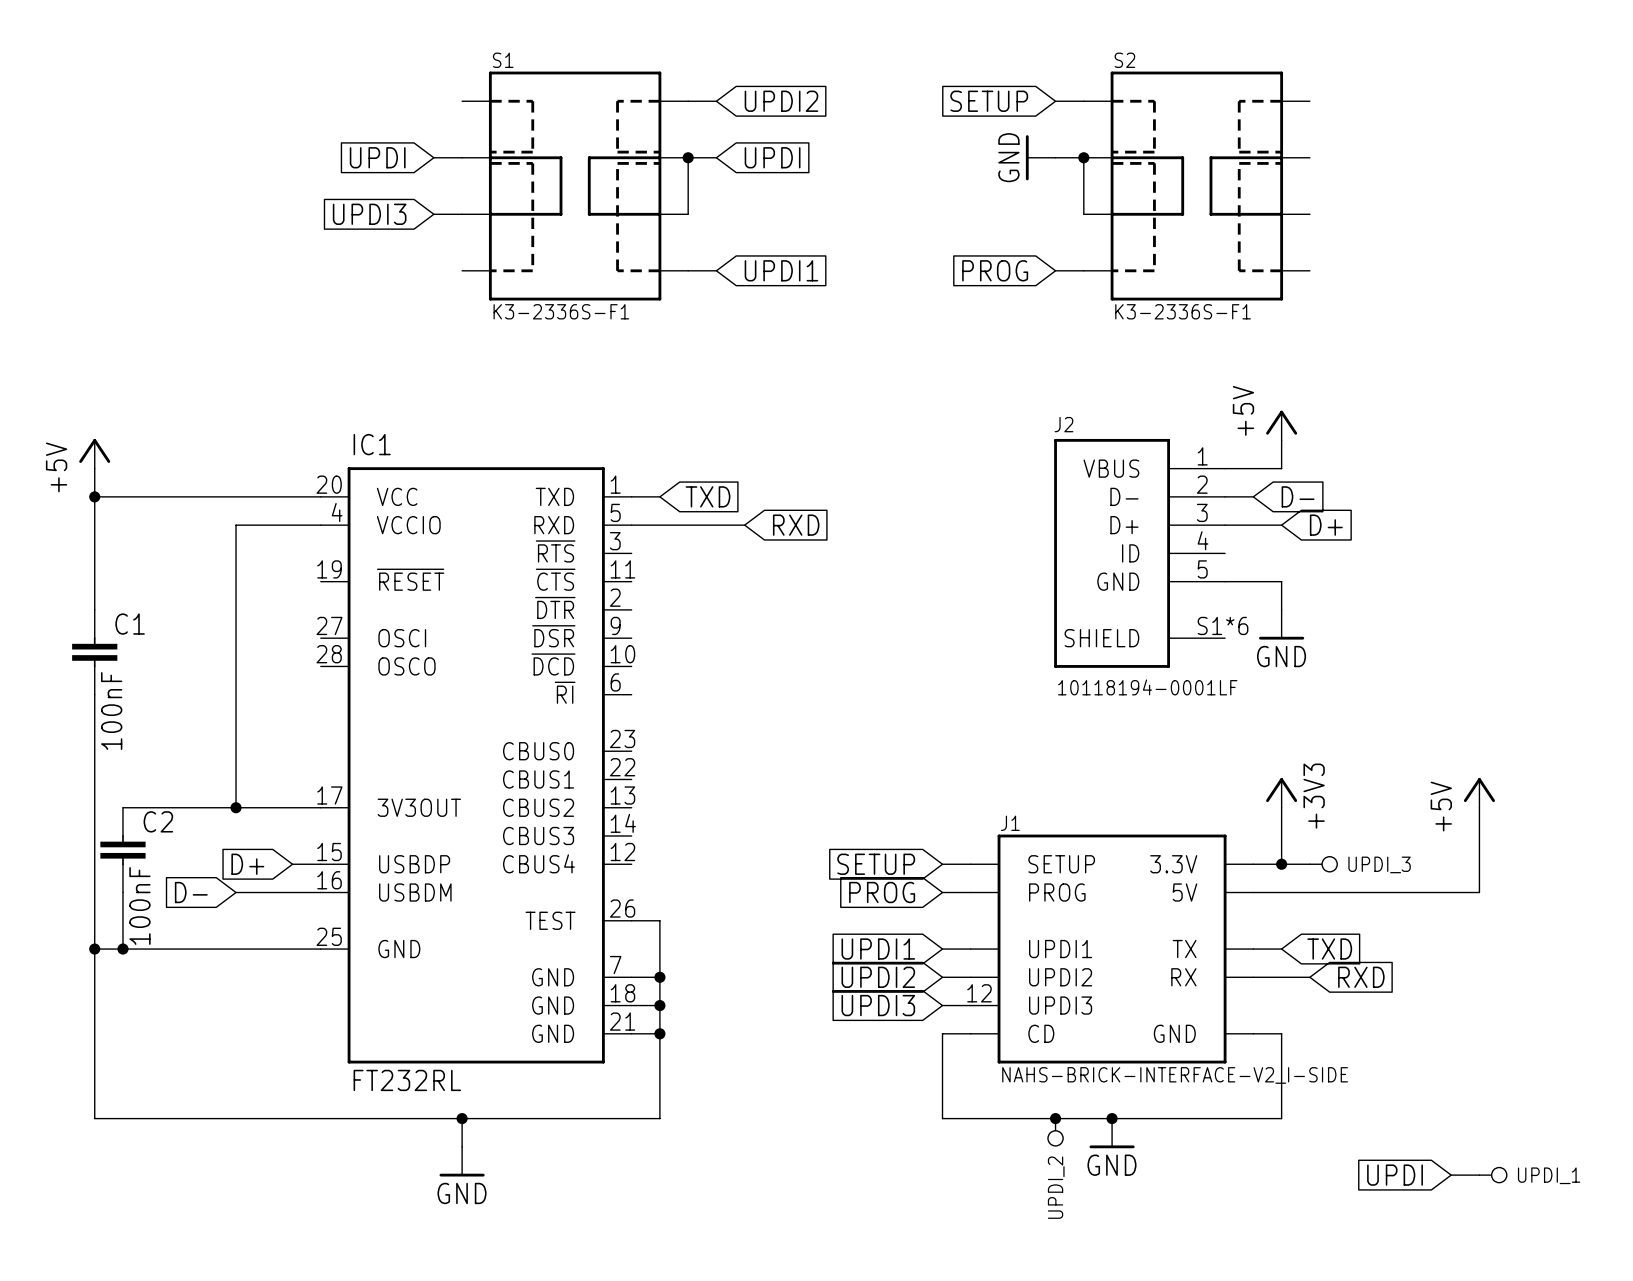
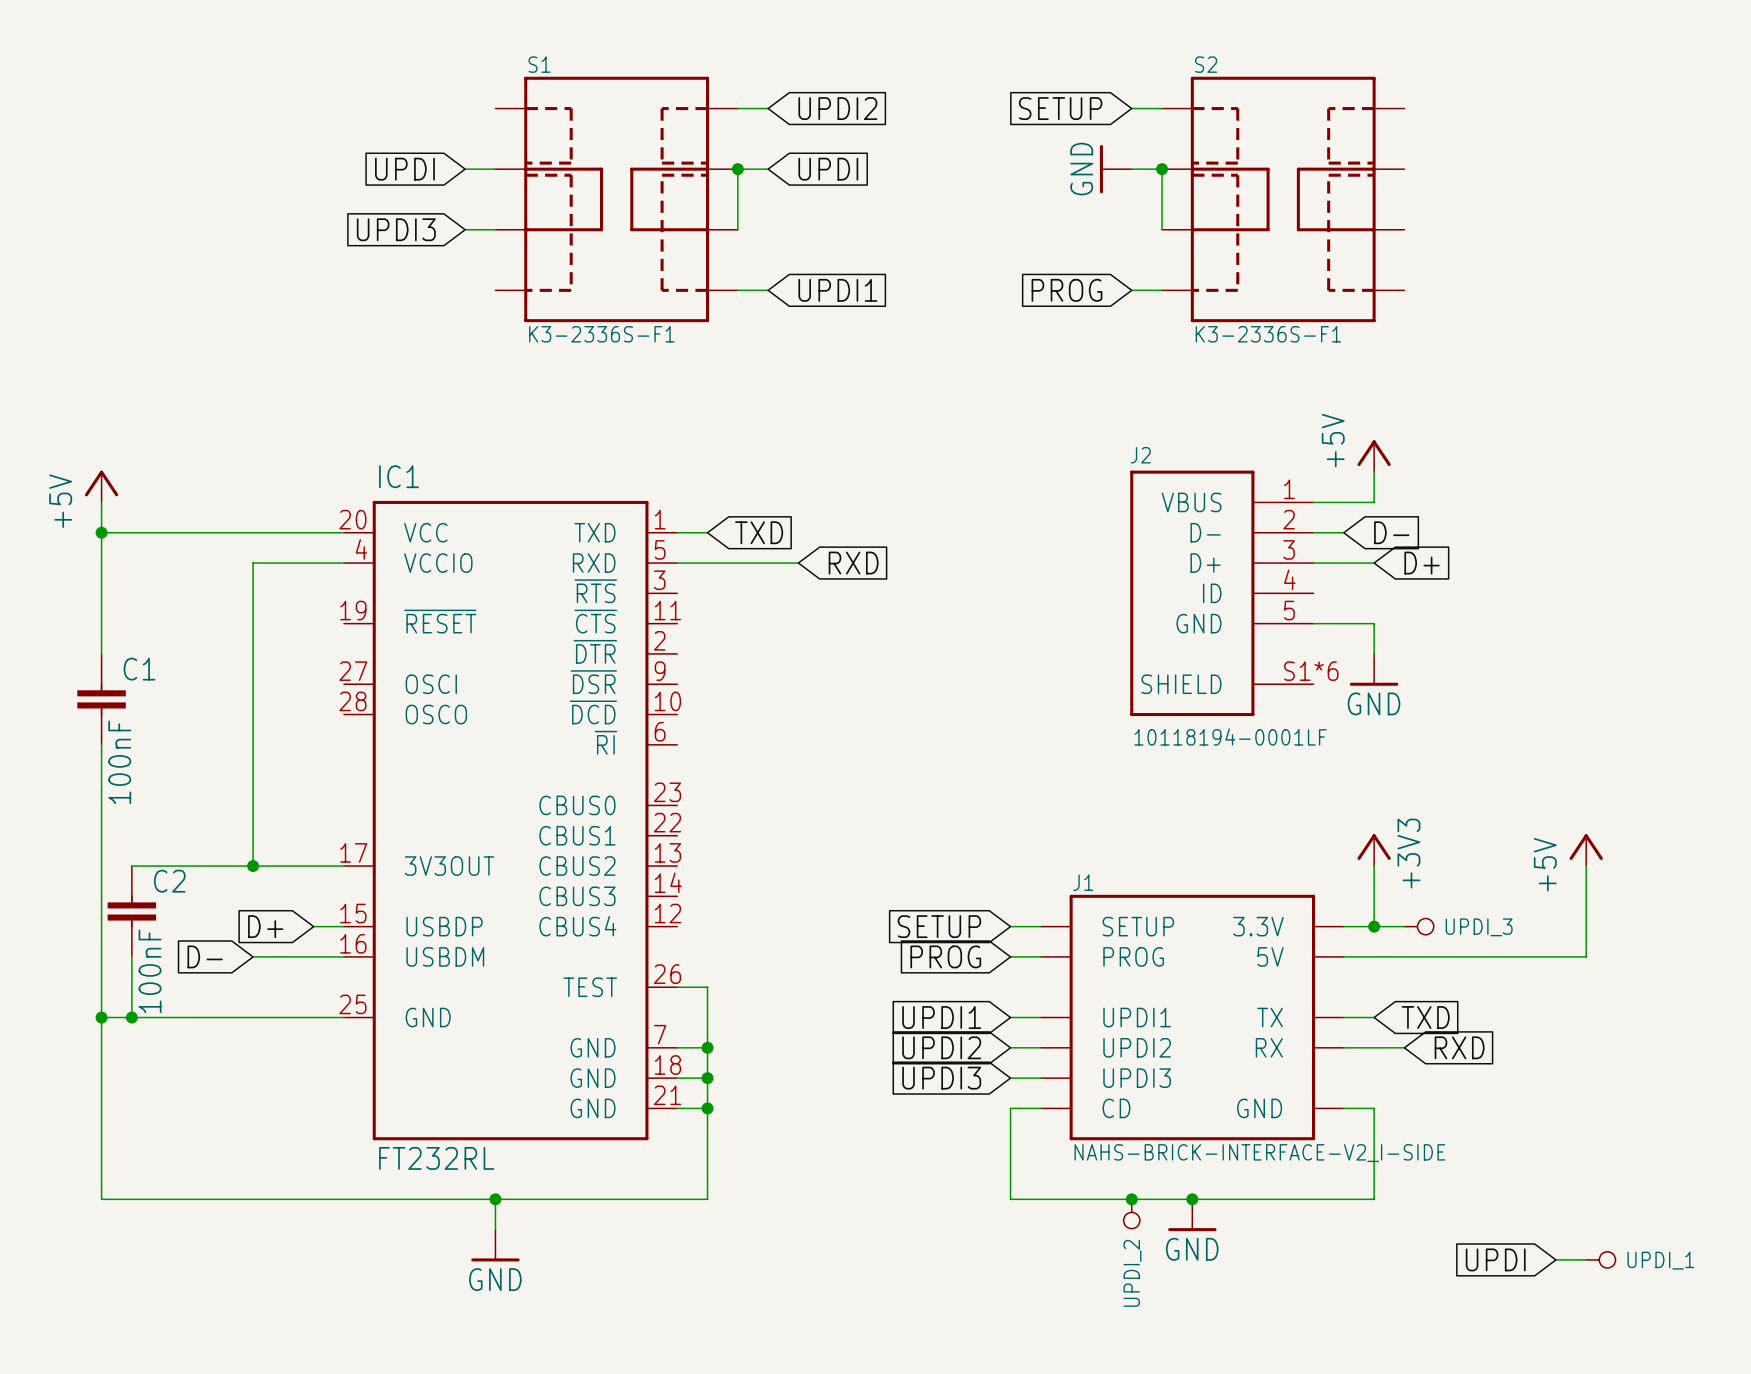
J1 pin number: 12 (979, 993) -> none

